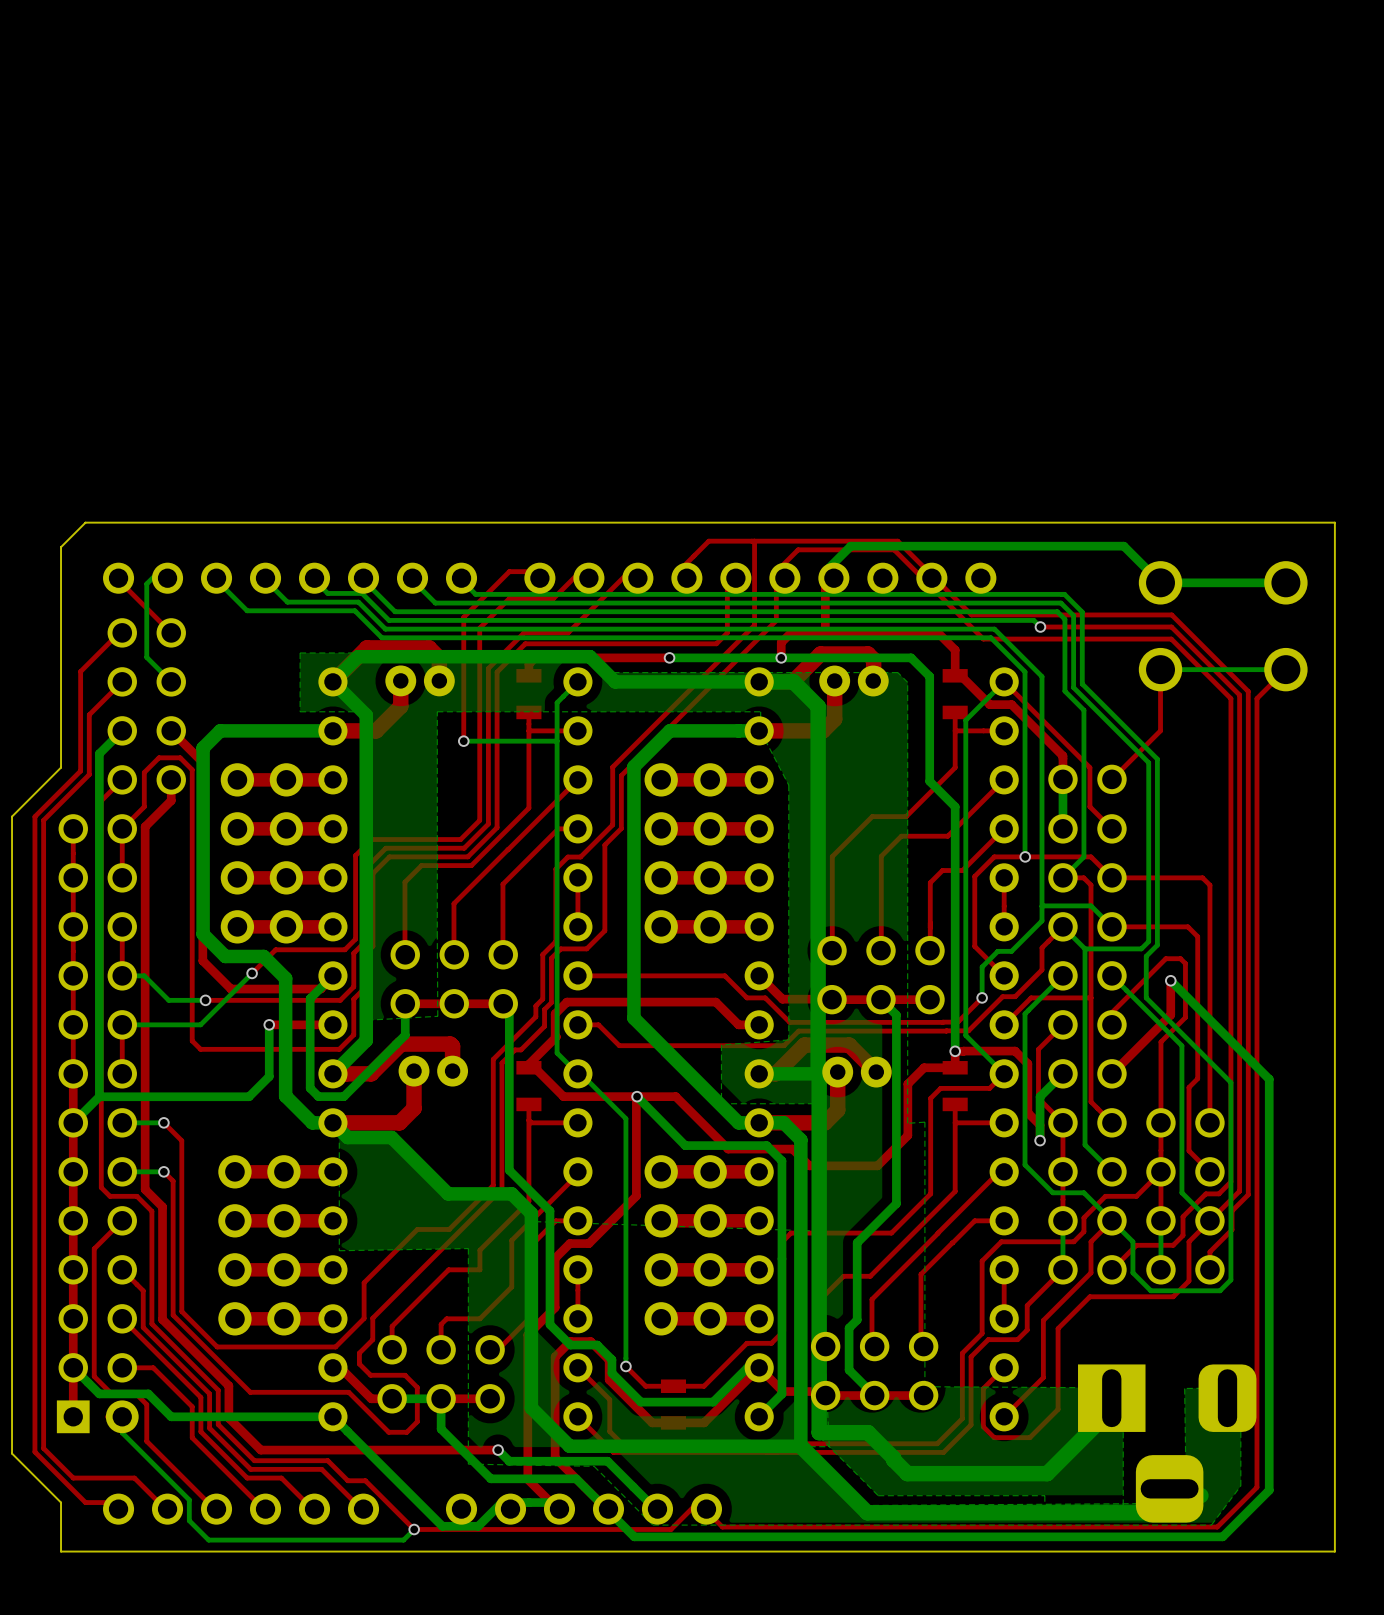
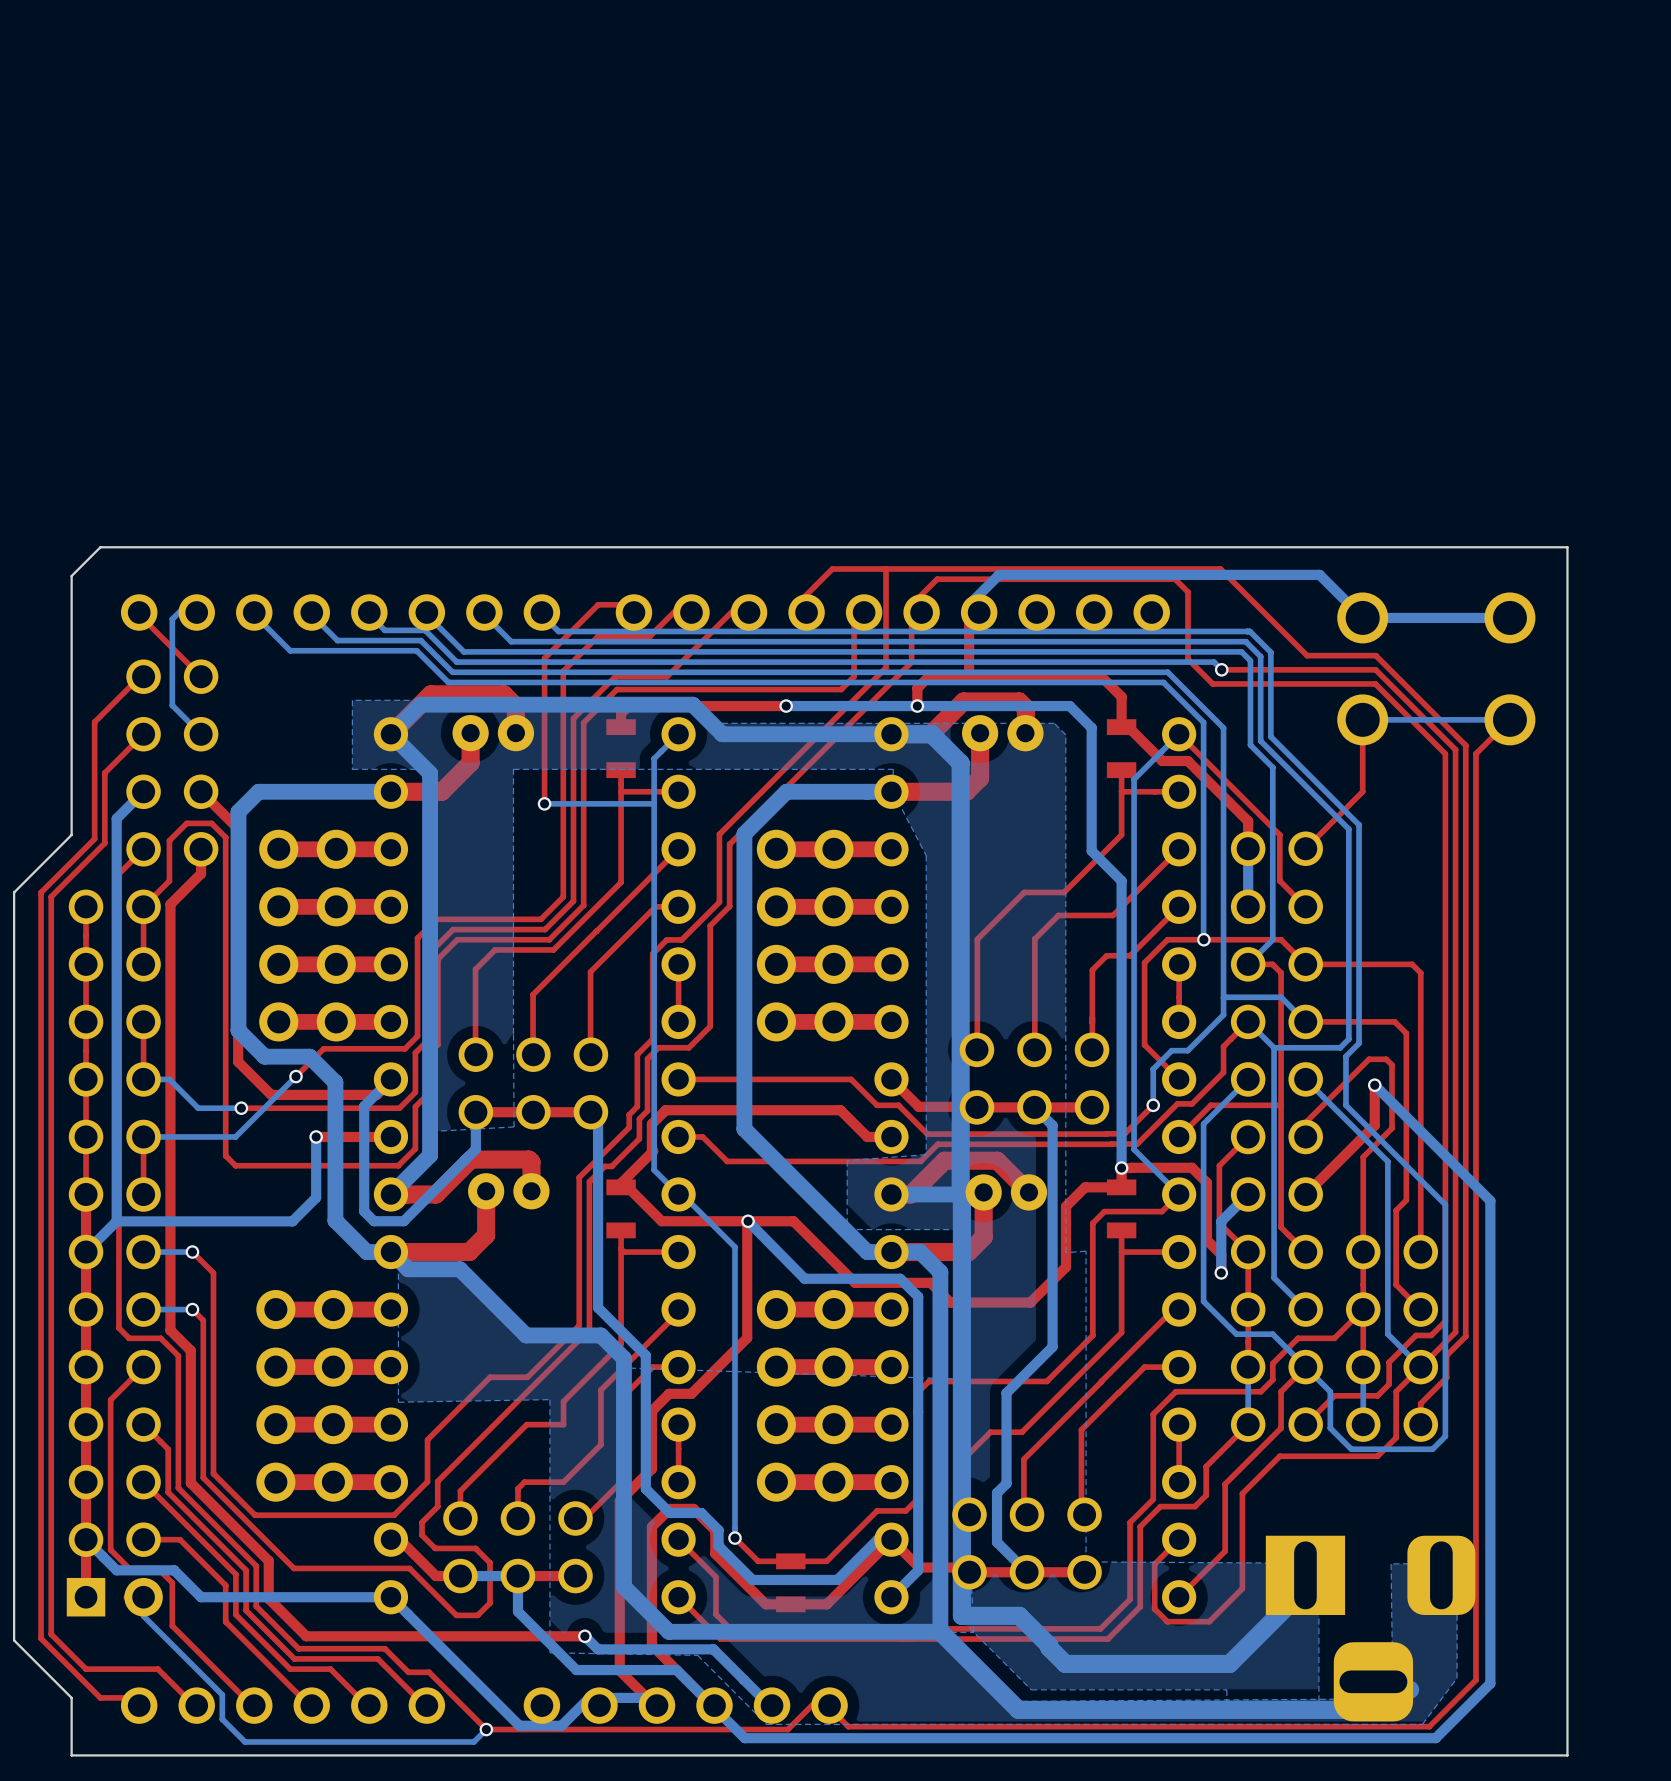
top track: (897, 541) (971, 614) (1113, 614) -> (1054, 569) (1220, 569) (1307, 655)
top track: (894, 549) (983, 639) (1032, 639) -> (1049, 579) (1175, 579) (1187, 592) (1187, 659) (1212, 683)

